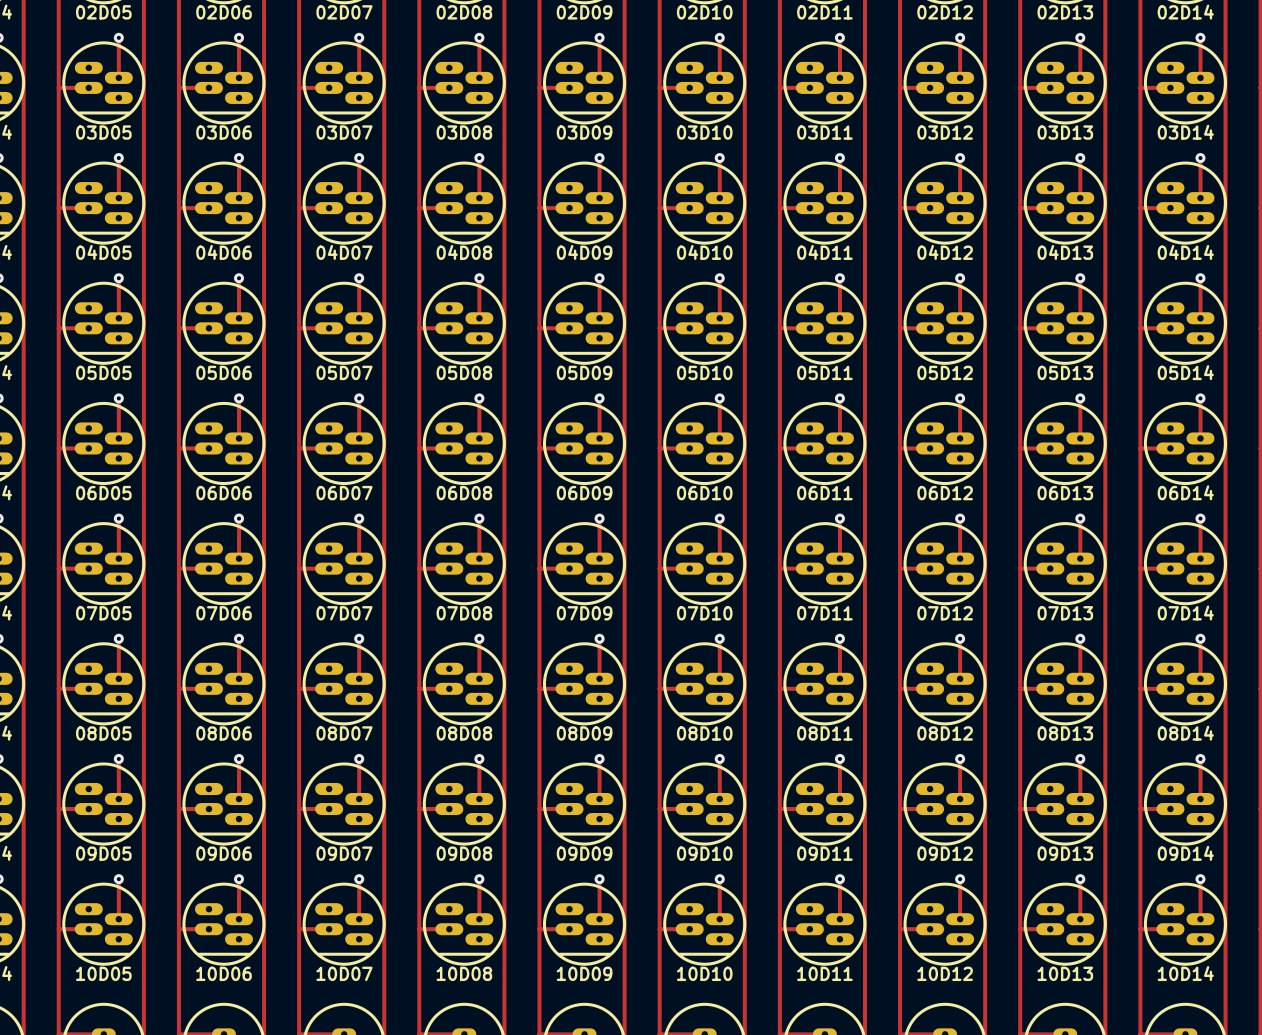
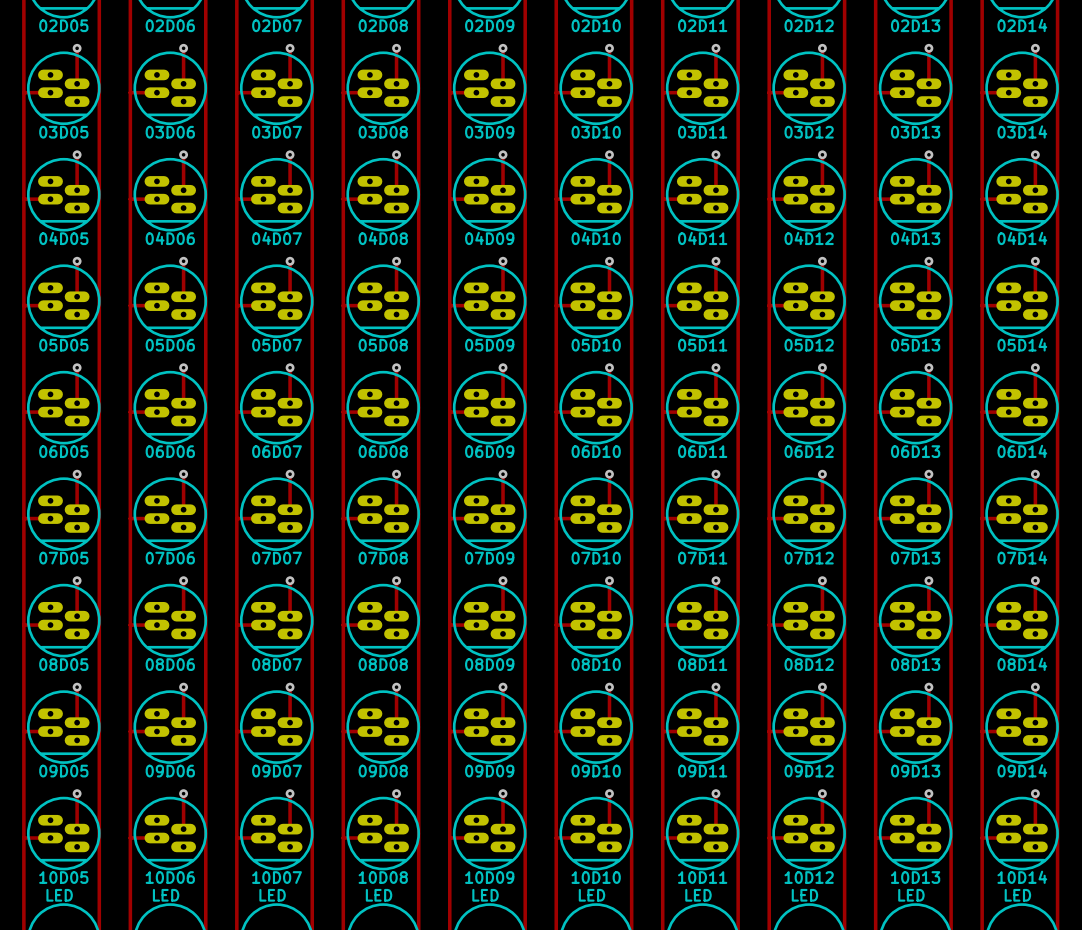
part value: none -> LED (59, 895)
part value: none -> LED (166, 895)
part value: none -> LED (272, 895)
part value: none -> LED (379, 895)
part value: none -> LED (485, 895)
part value: none -> LED (591, 895)
part value: none -> LED (698, 895)
part value: none -> LED (804, 895)
part value: none -> LED (911, 895)
part value: none -> LED (1017, 895)

